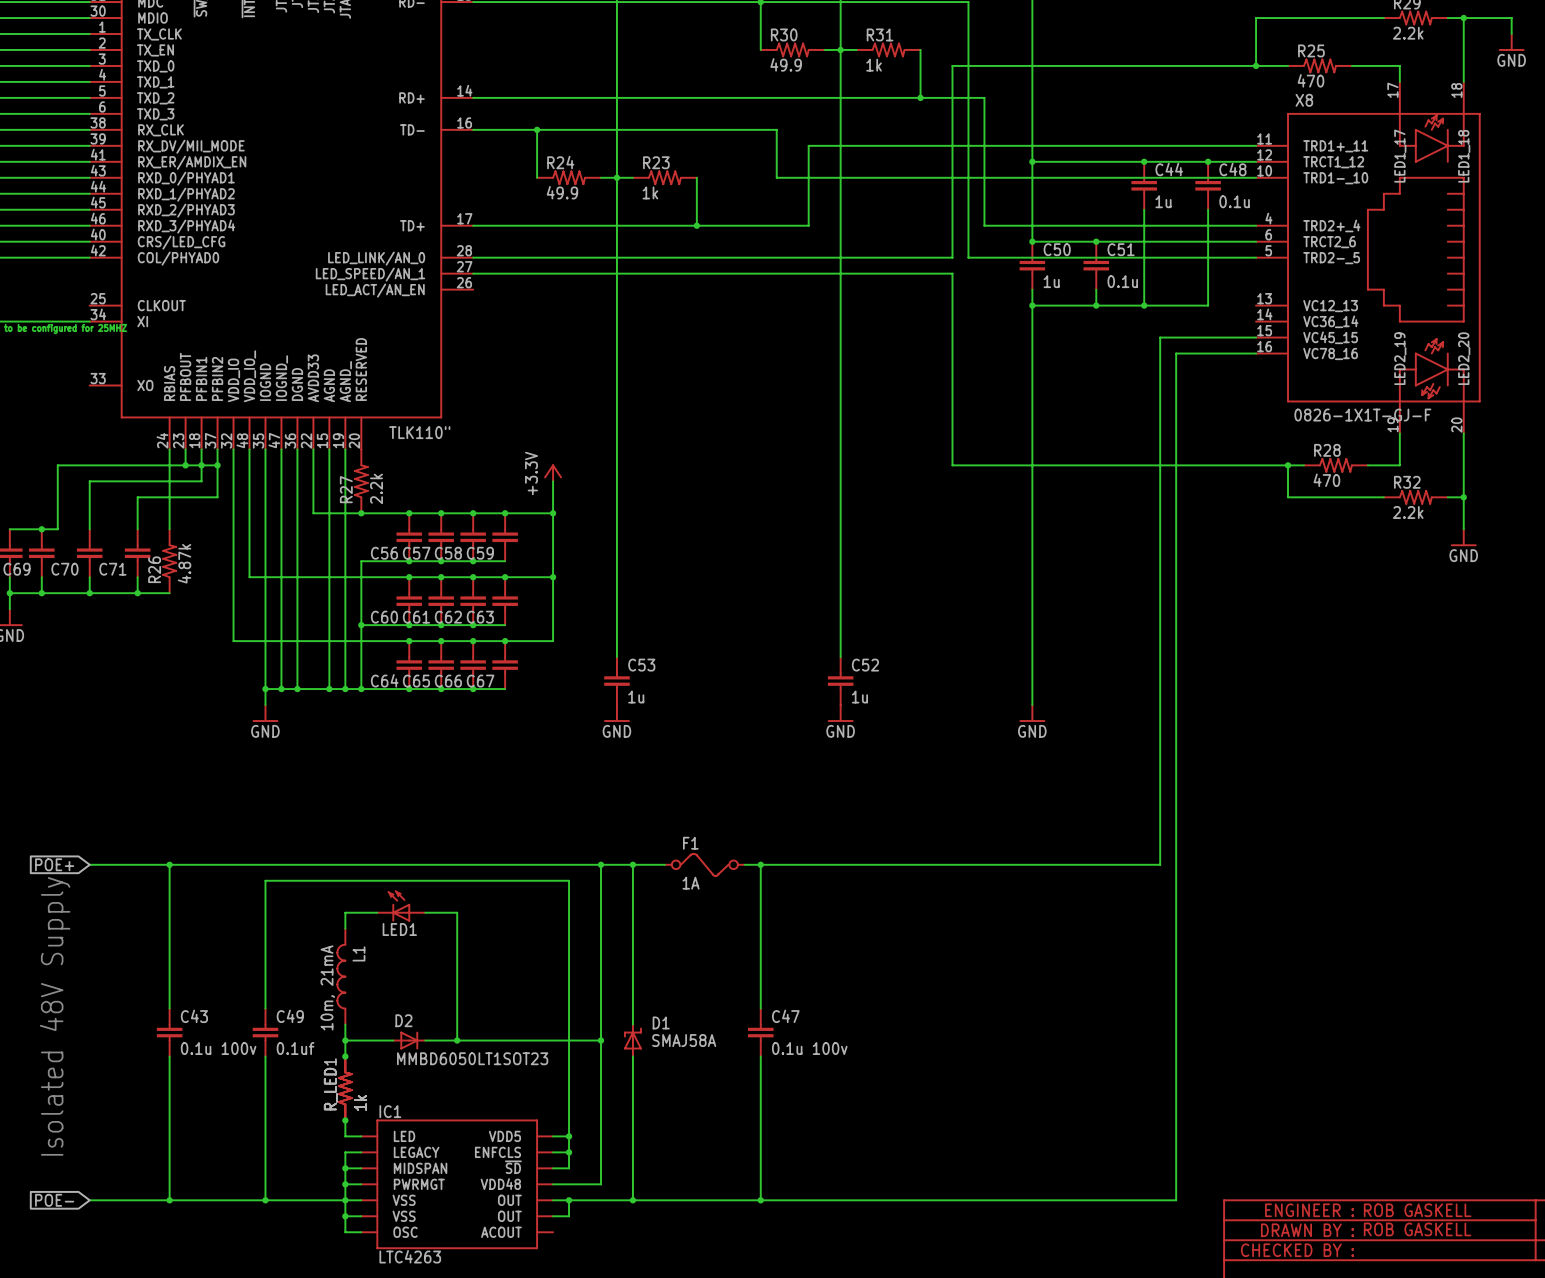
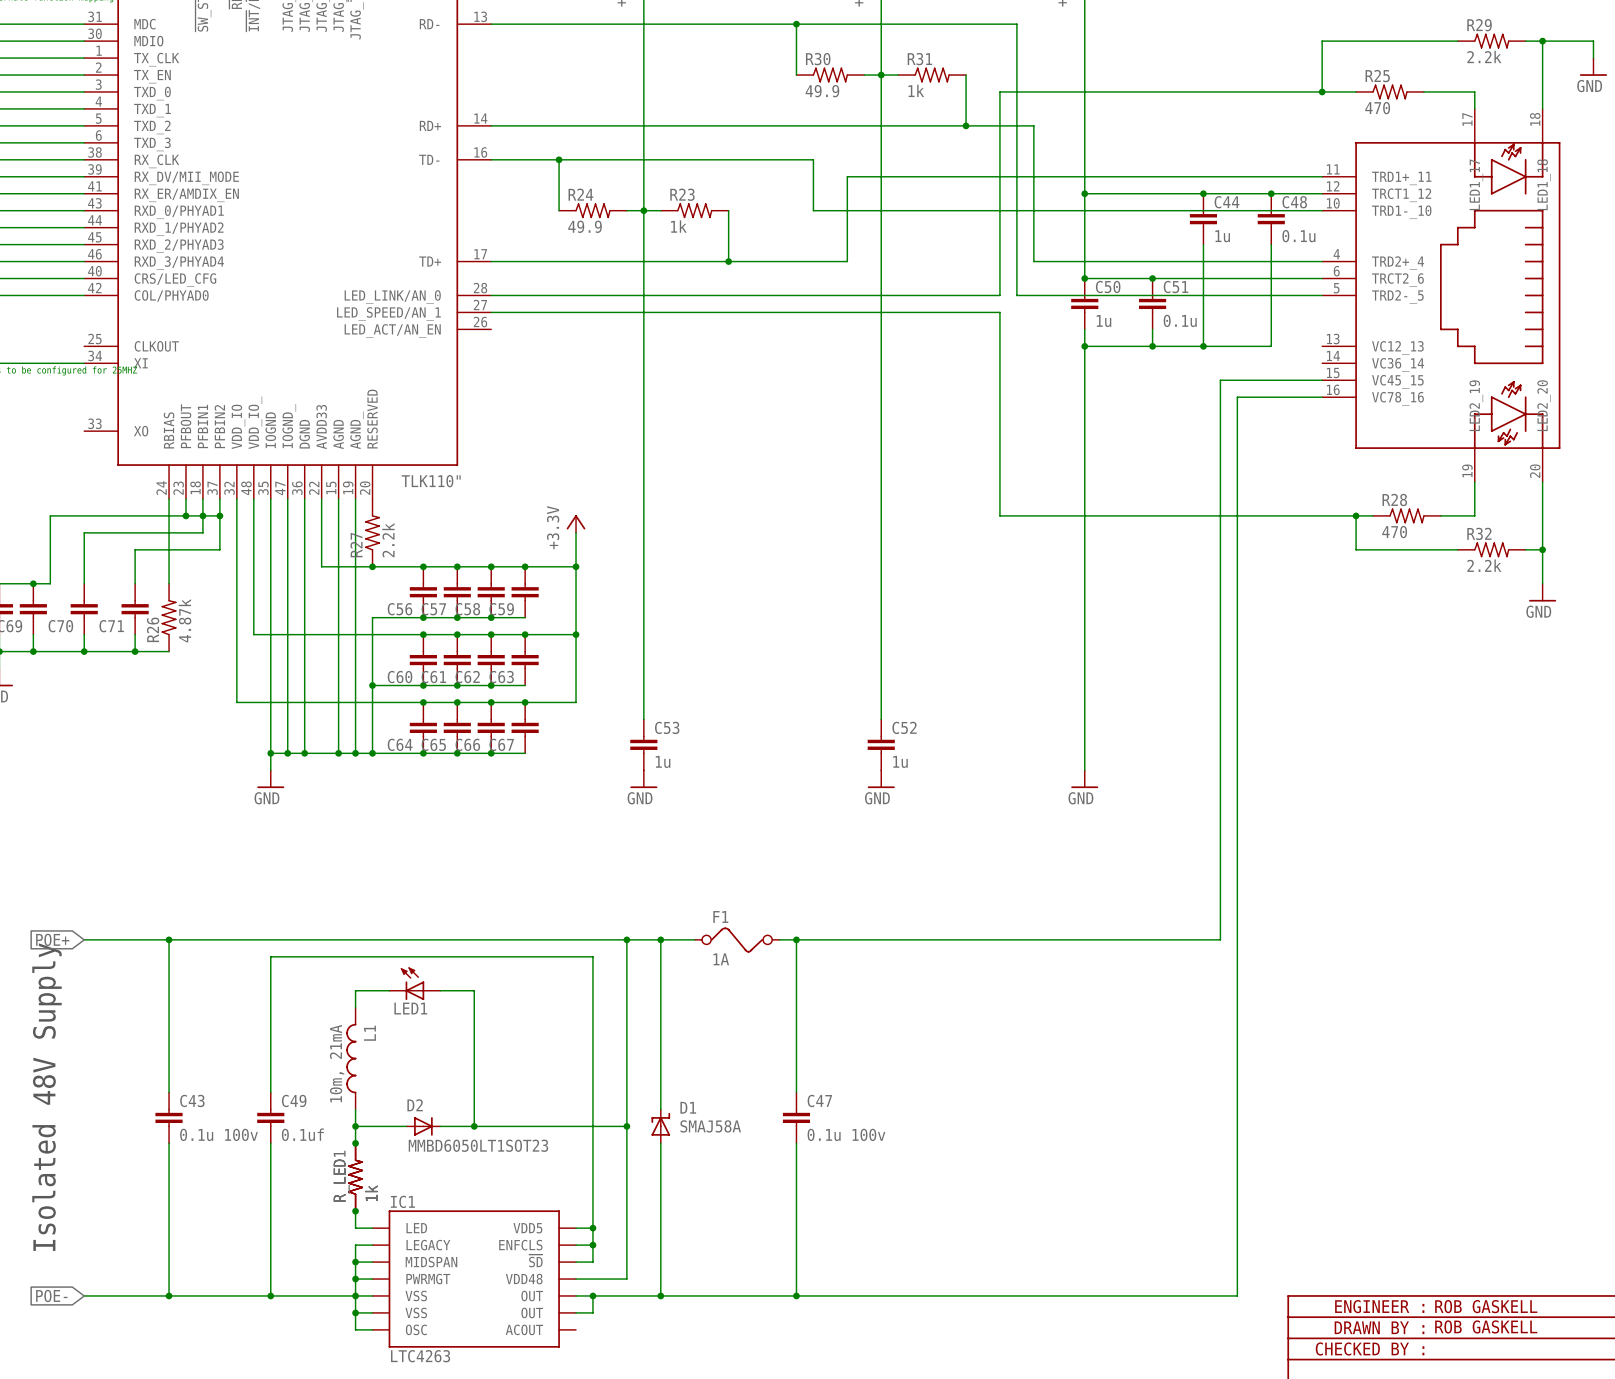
X8 name: X8 (1304, 100) -> none
X8 value: 0826-1X1T-GJ-F (1362, 415) -> none

